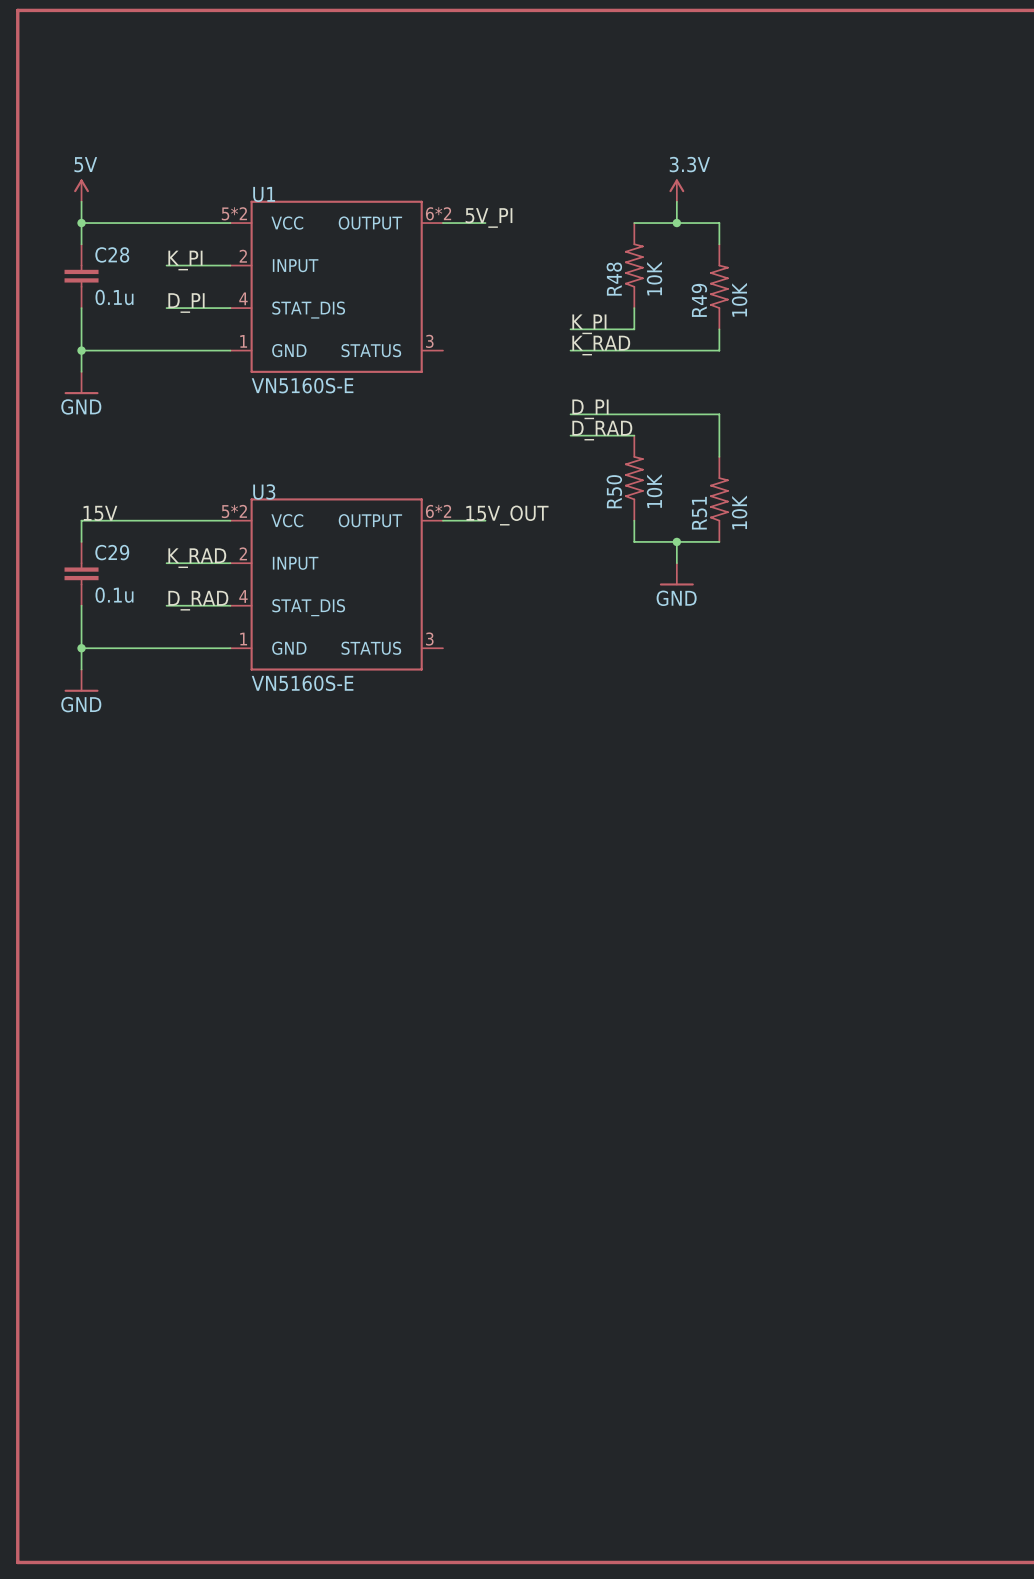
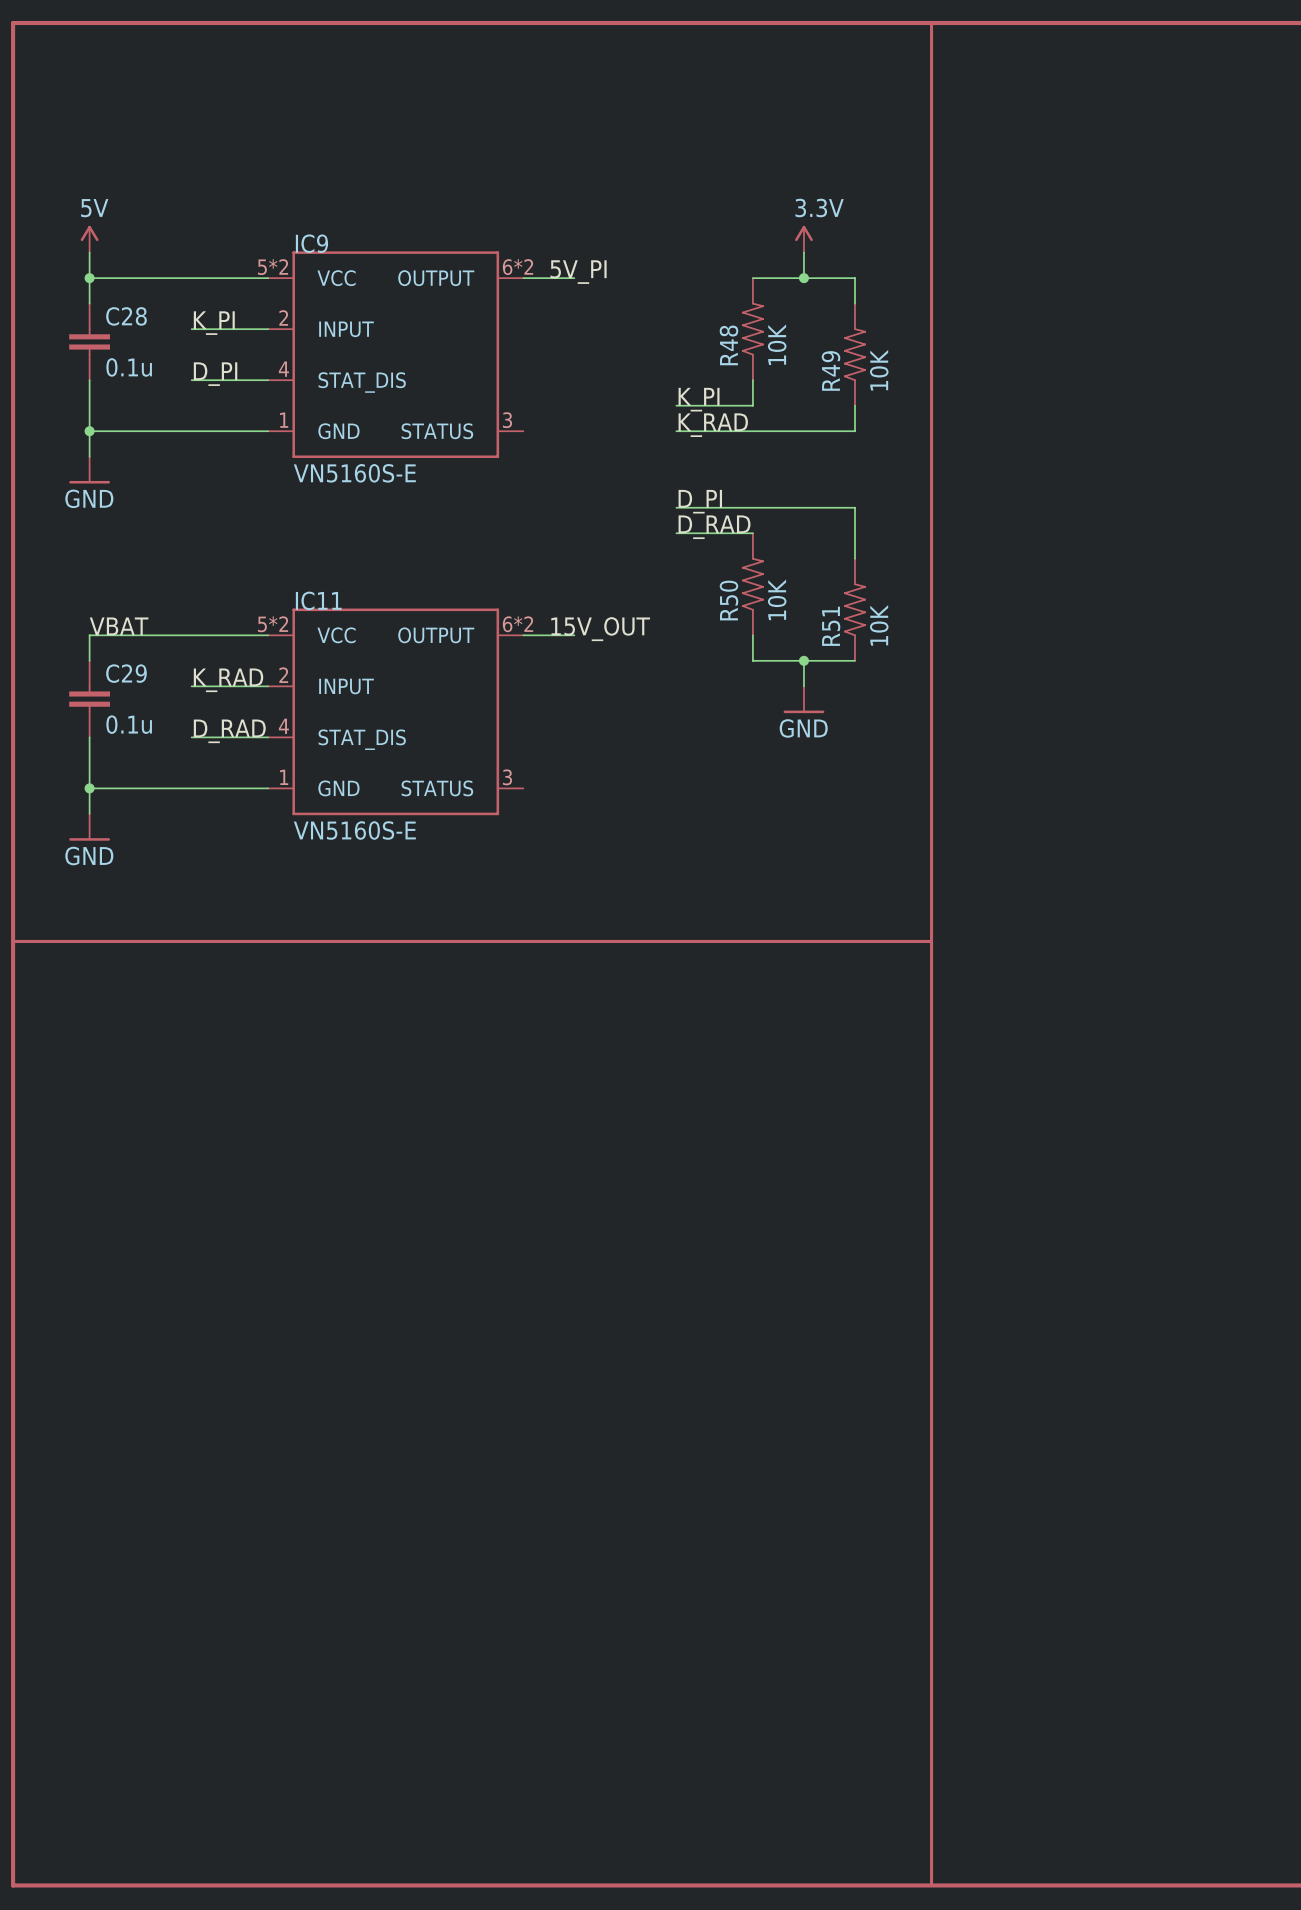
line: none -> (931, 23) (931, 1885)
U1 name: U1 (264, 194) -> IC9 (311, 243)
U3 name: U3 (264, 491) -> IC11 (318, 600)
label: 15V (100, 513) -> VBAT (119, 626)
line: none -> (13, 941) (931, 941)

